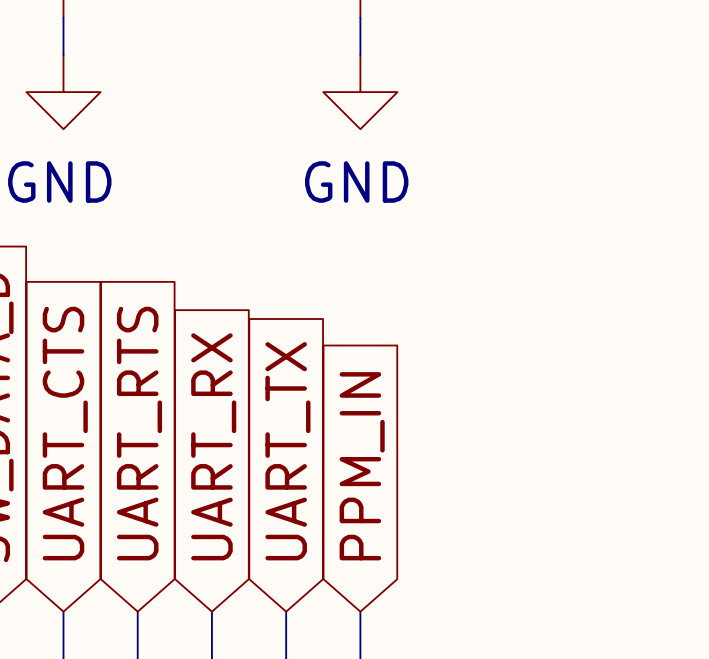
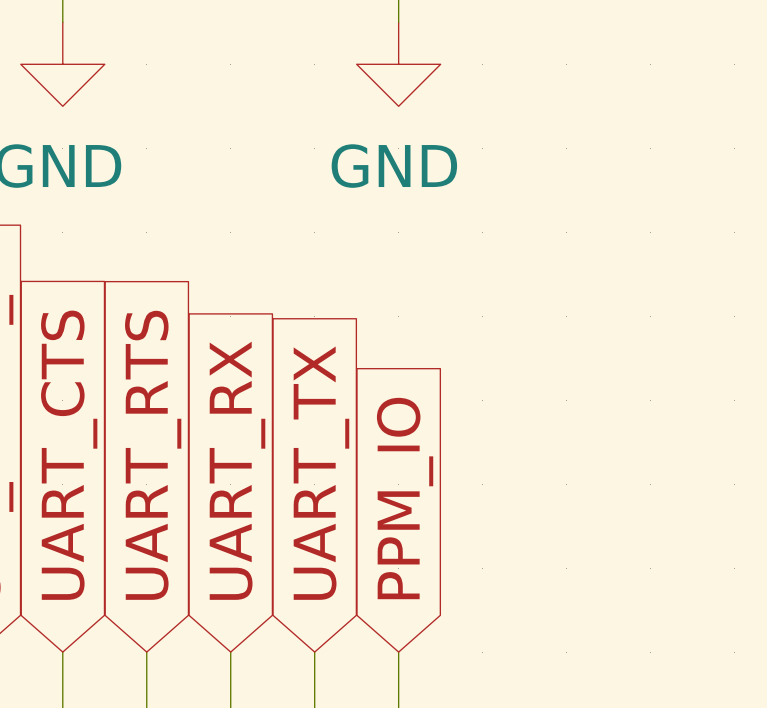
global label: PPM_IN (362, 466) -> PPM_IO (405, 498)

